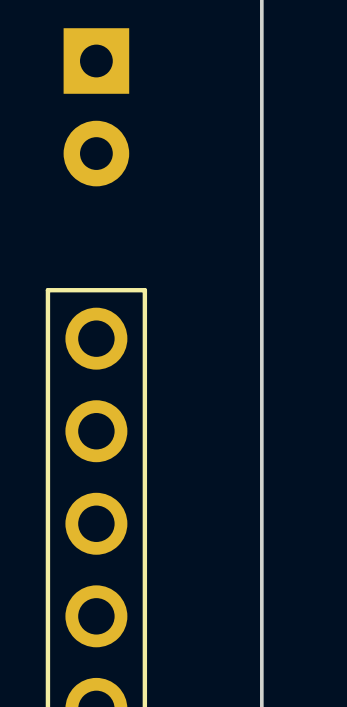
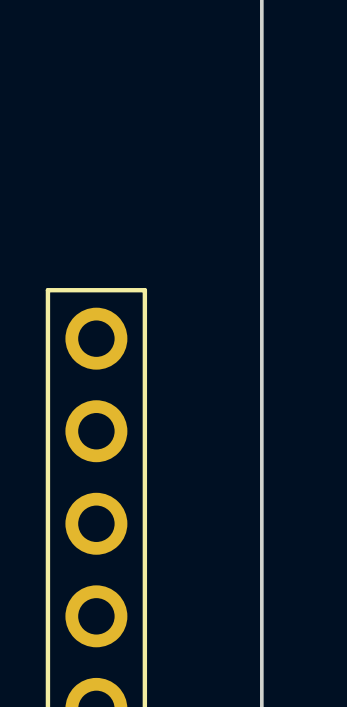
part: (96, 107) -> none

